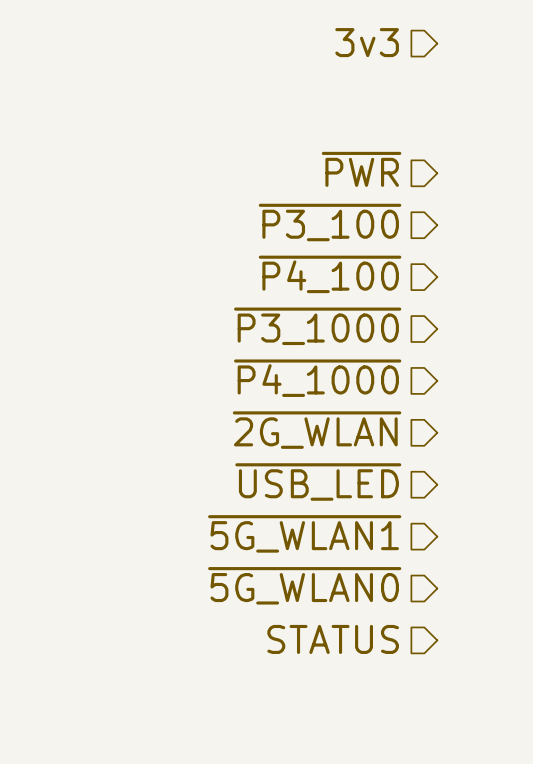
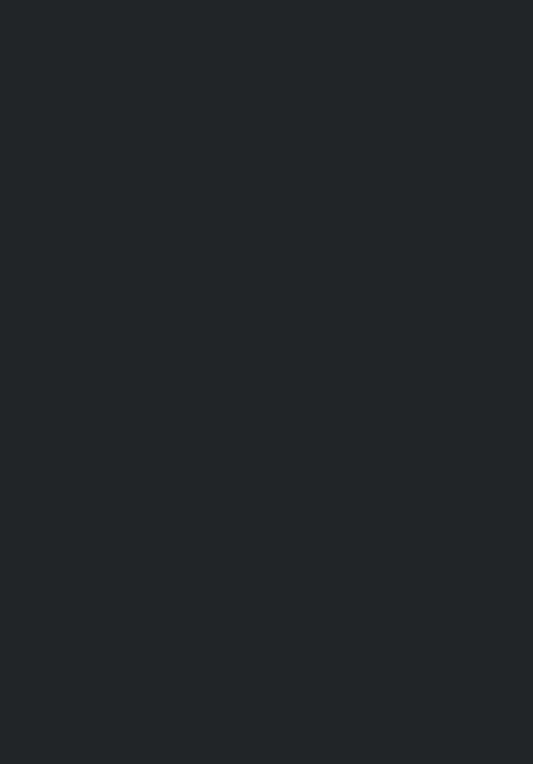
hierarchical label: 3v3 (367, 42) -> none
hierarchical label: ~{PWR} (361, 169) -> none
hierarchical label: ~{P3_100} (330, 222) -> none
hierarchical label: ~{P4_100} (330, 274) -> none
hierarchical label: ~{P3_1000} (317, 326) -> none
hierarchical label: ~{P4_1000} (317, 378) -> none
hierarchical label: ~{2G_WLAN} (317, 430) -> none
hierarchical label: ~{USB_LED} (318, 482) -> none
hierarchical label: ~{5G_WLAN1} (304, 533) -> none
hierarchical label: ~{5G_WLAN0} (304, 585) -> none
hierarchical label: STATUS (333, 639) -> none

